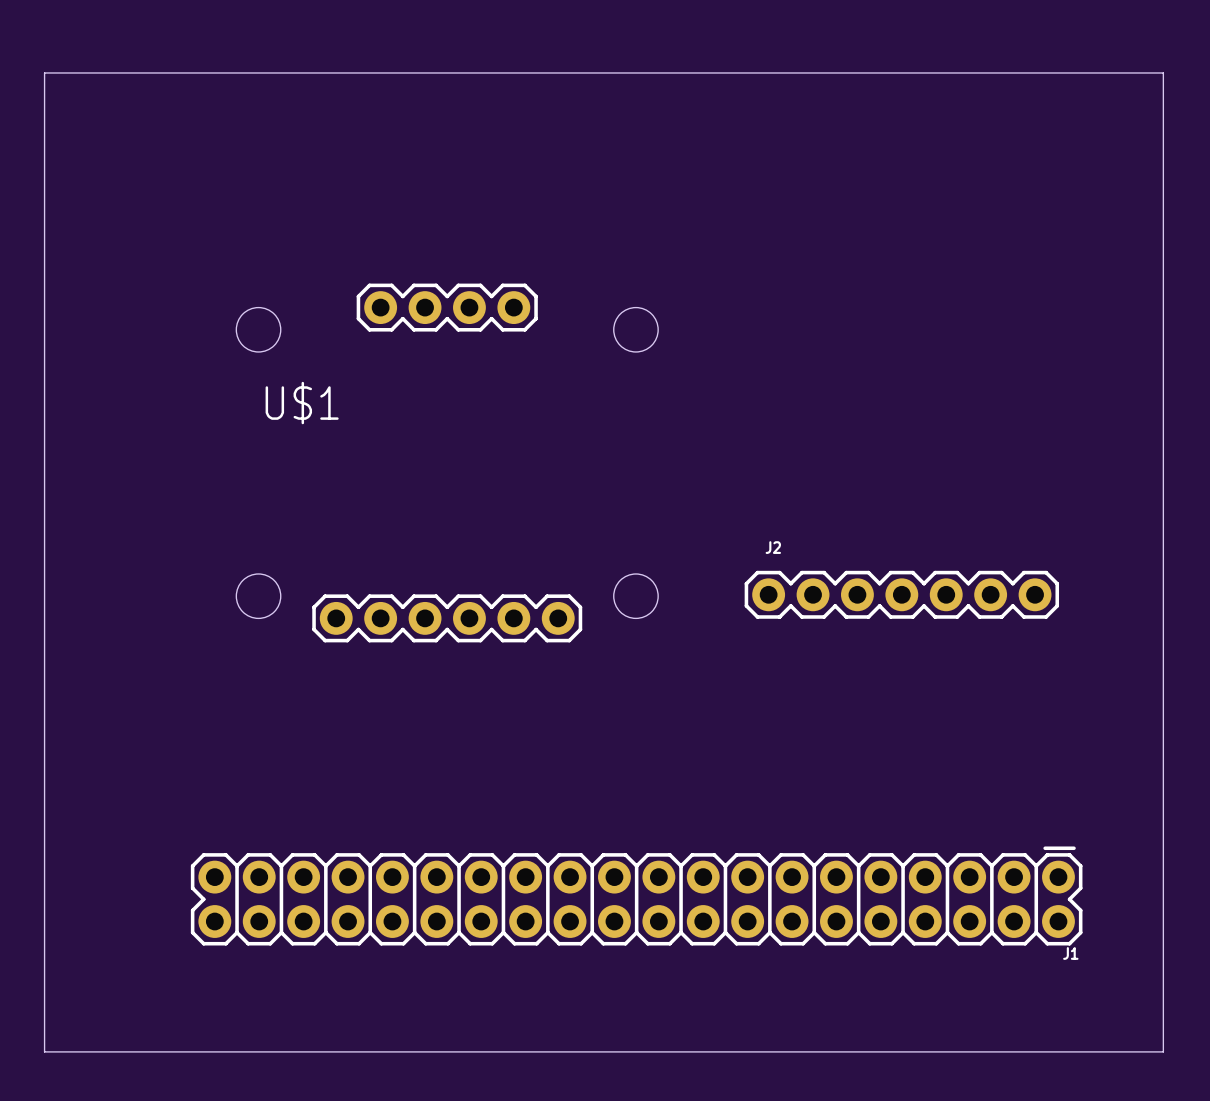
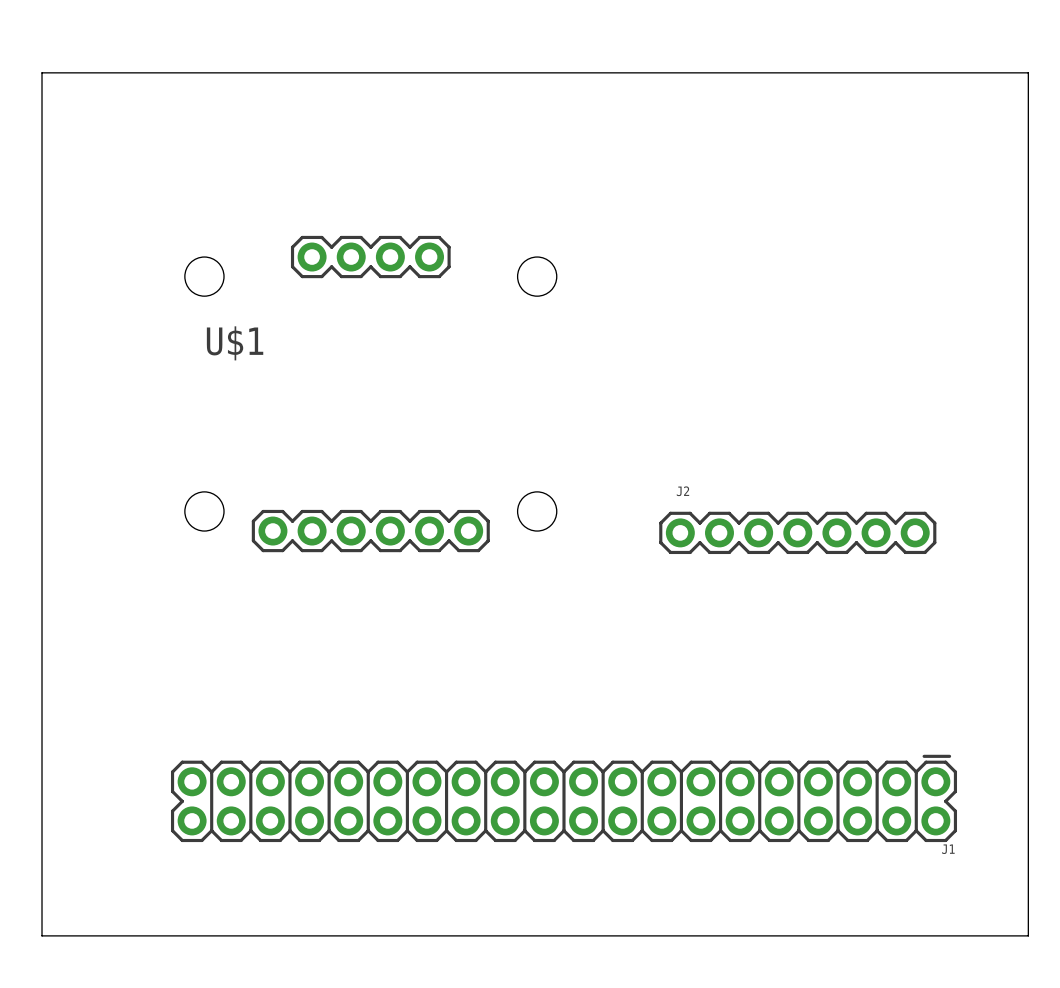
U$1 position: (447, 462) -> (370, 394)

